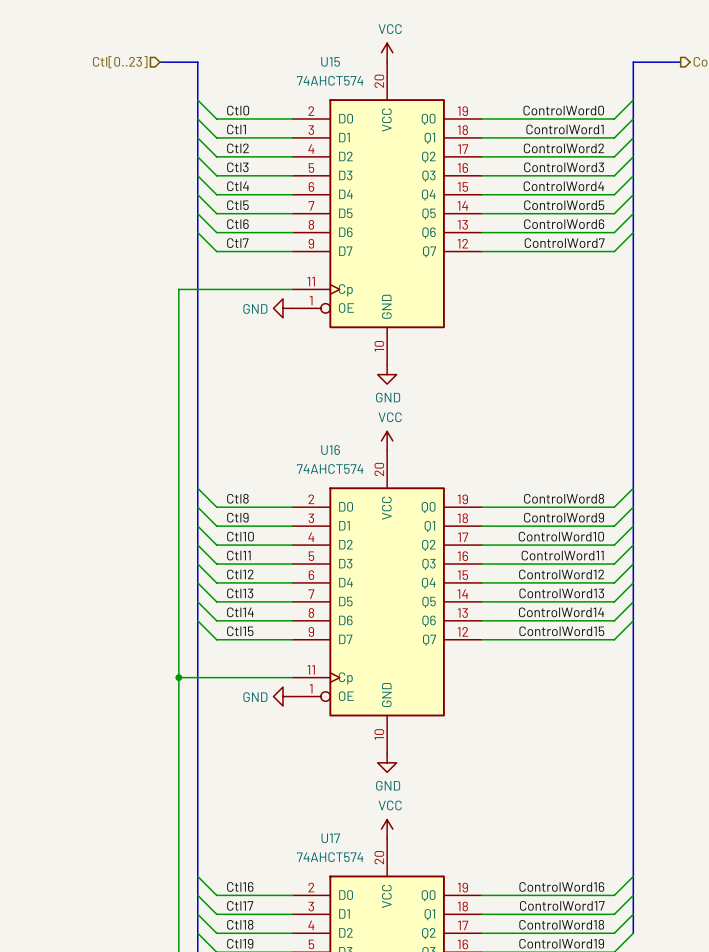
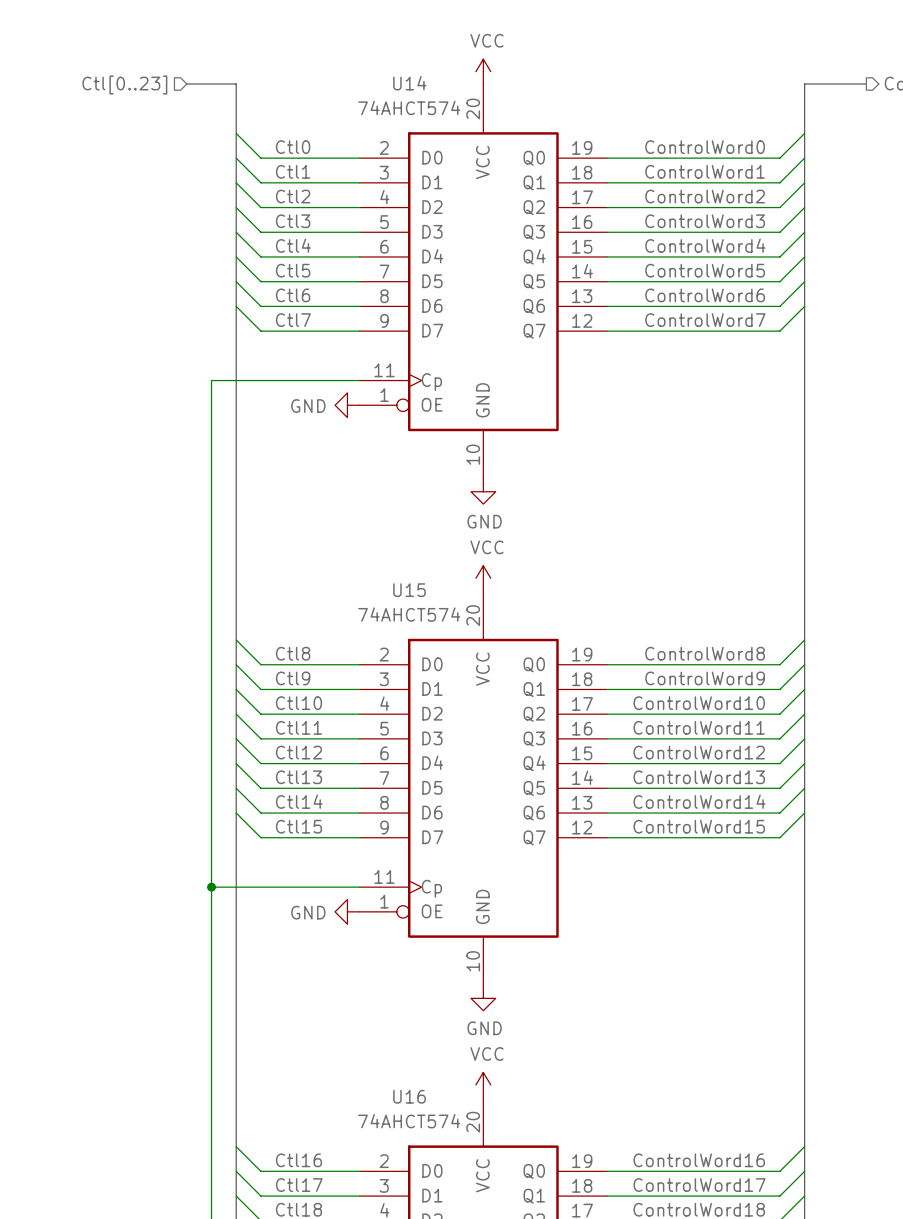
U15 name: U15 (330, 61) -> U14 (409, 83)
U16 name: U16 (330, 450) -> U15 (409, 590)
U17 name: U17 (330, 838) -> U16 (409, 1096)

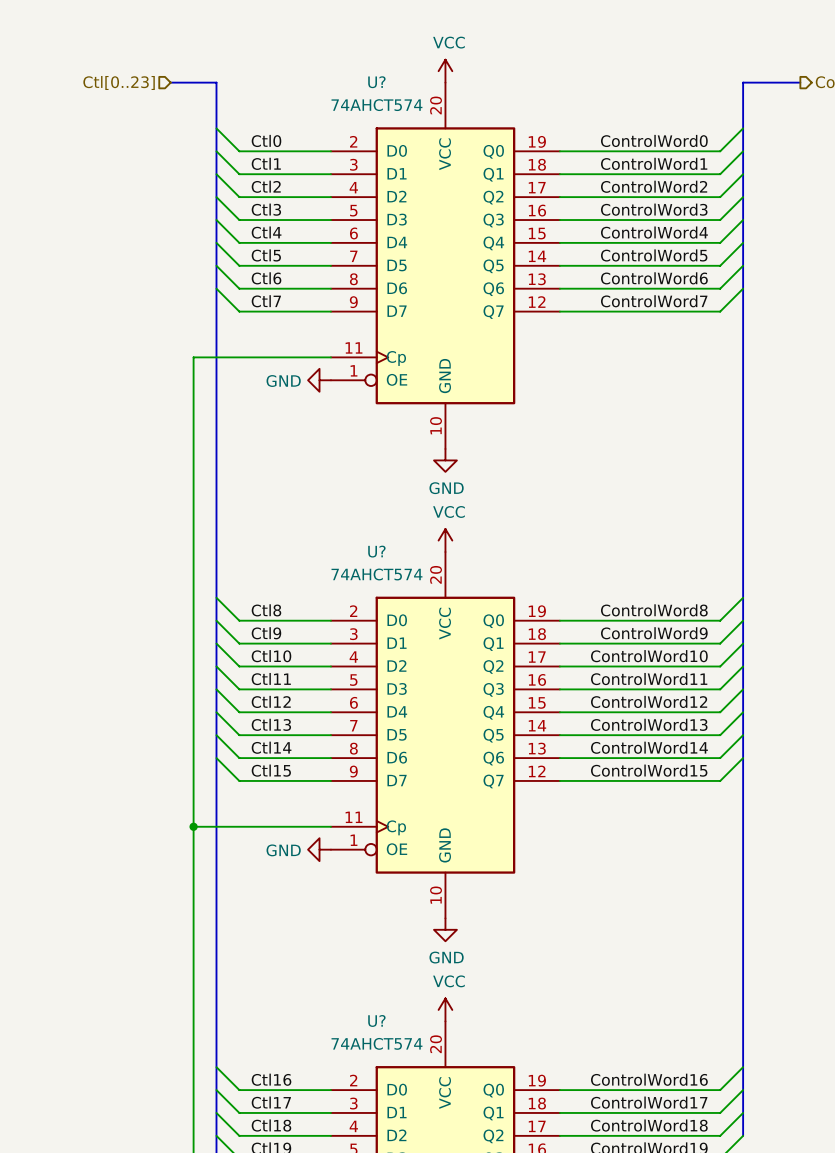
U14 name: U14 (409, 83) -> U? (376, 82)
U15 name: U15 (409, 590) -> U? (376, 551)
U16 name: U16 (409, 1096) -> U? (376, 1020)

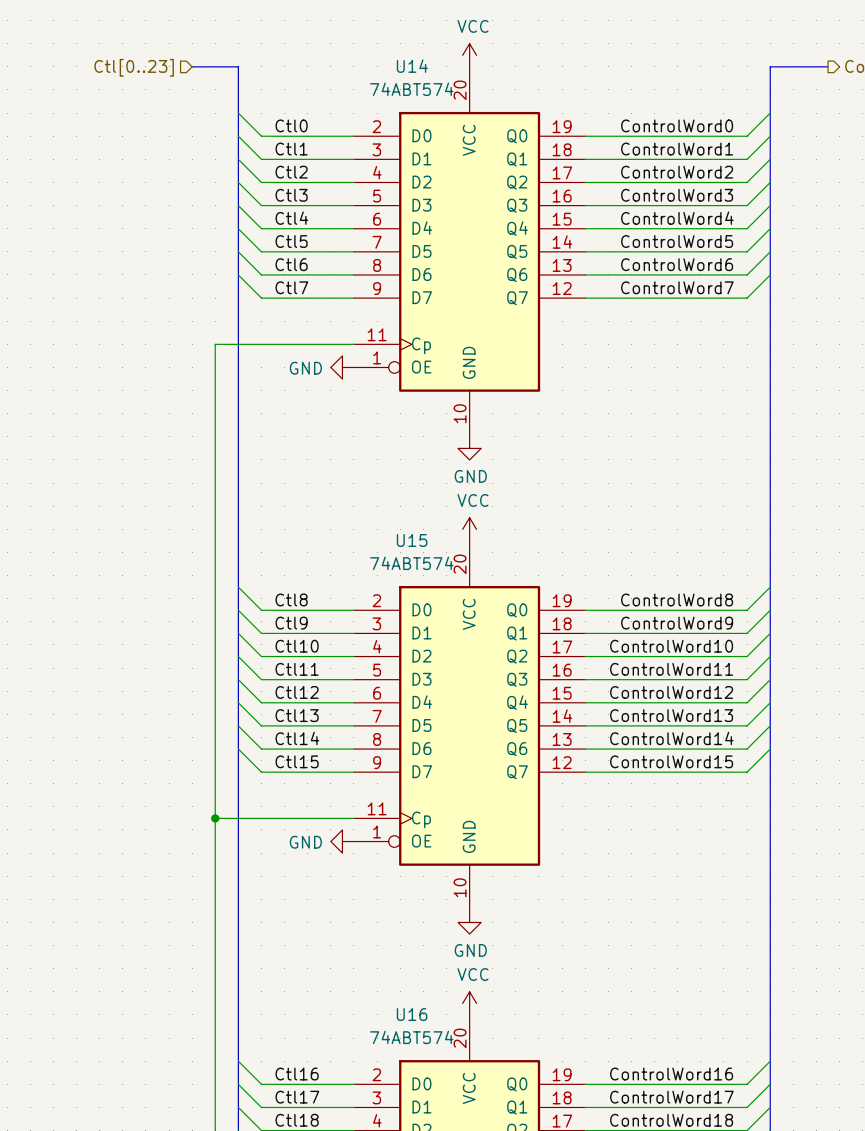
U? name: U? (376, 82) -> U14 (412, 66)
U? value: 74AHCT574 (376, 105) -> 74ABT574 (411, 89)
U? name: U? (376, 551) -> U15 (412, 540)
U? value: 74AHCT574 (376, 574) -> 74ABT574 (411, 563)
U? name: U? (376, 1020) -> U16 (412, 1014)
U? value: 74AHCT574 (376, 1043) -> 74ABT574 (411, 1037)

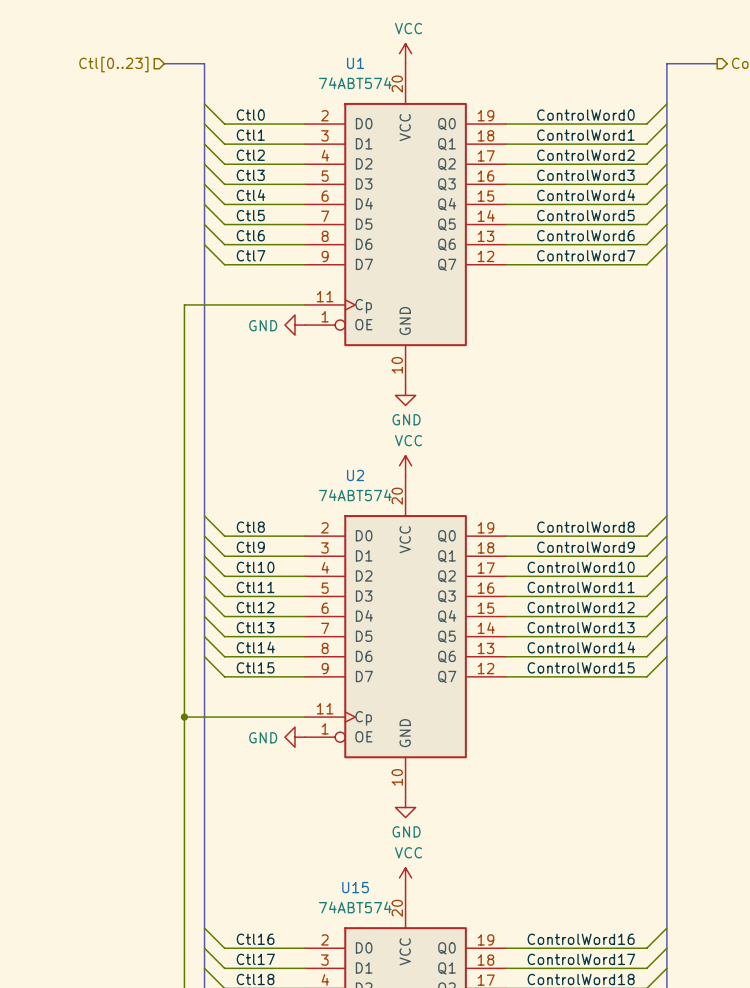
U14 name: U14 (412, 66) -> U1 (355, 63)
U15 name: U15 (412, 540) -> U2 (355, 475)
U16 name: U16 (412, 1014) -> U15 (355, 887)

